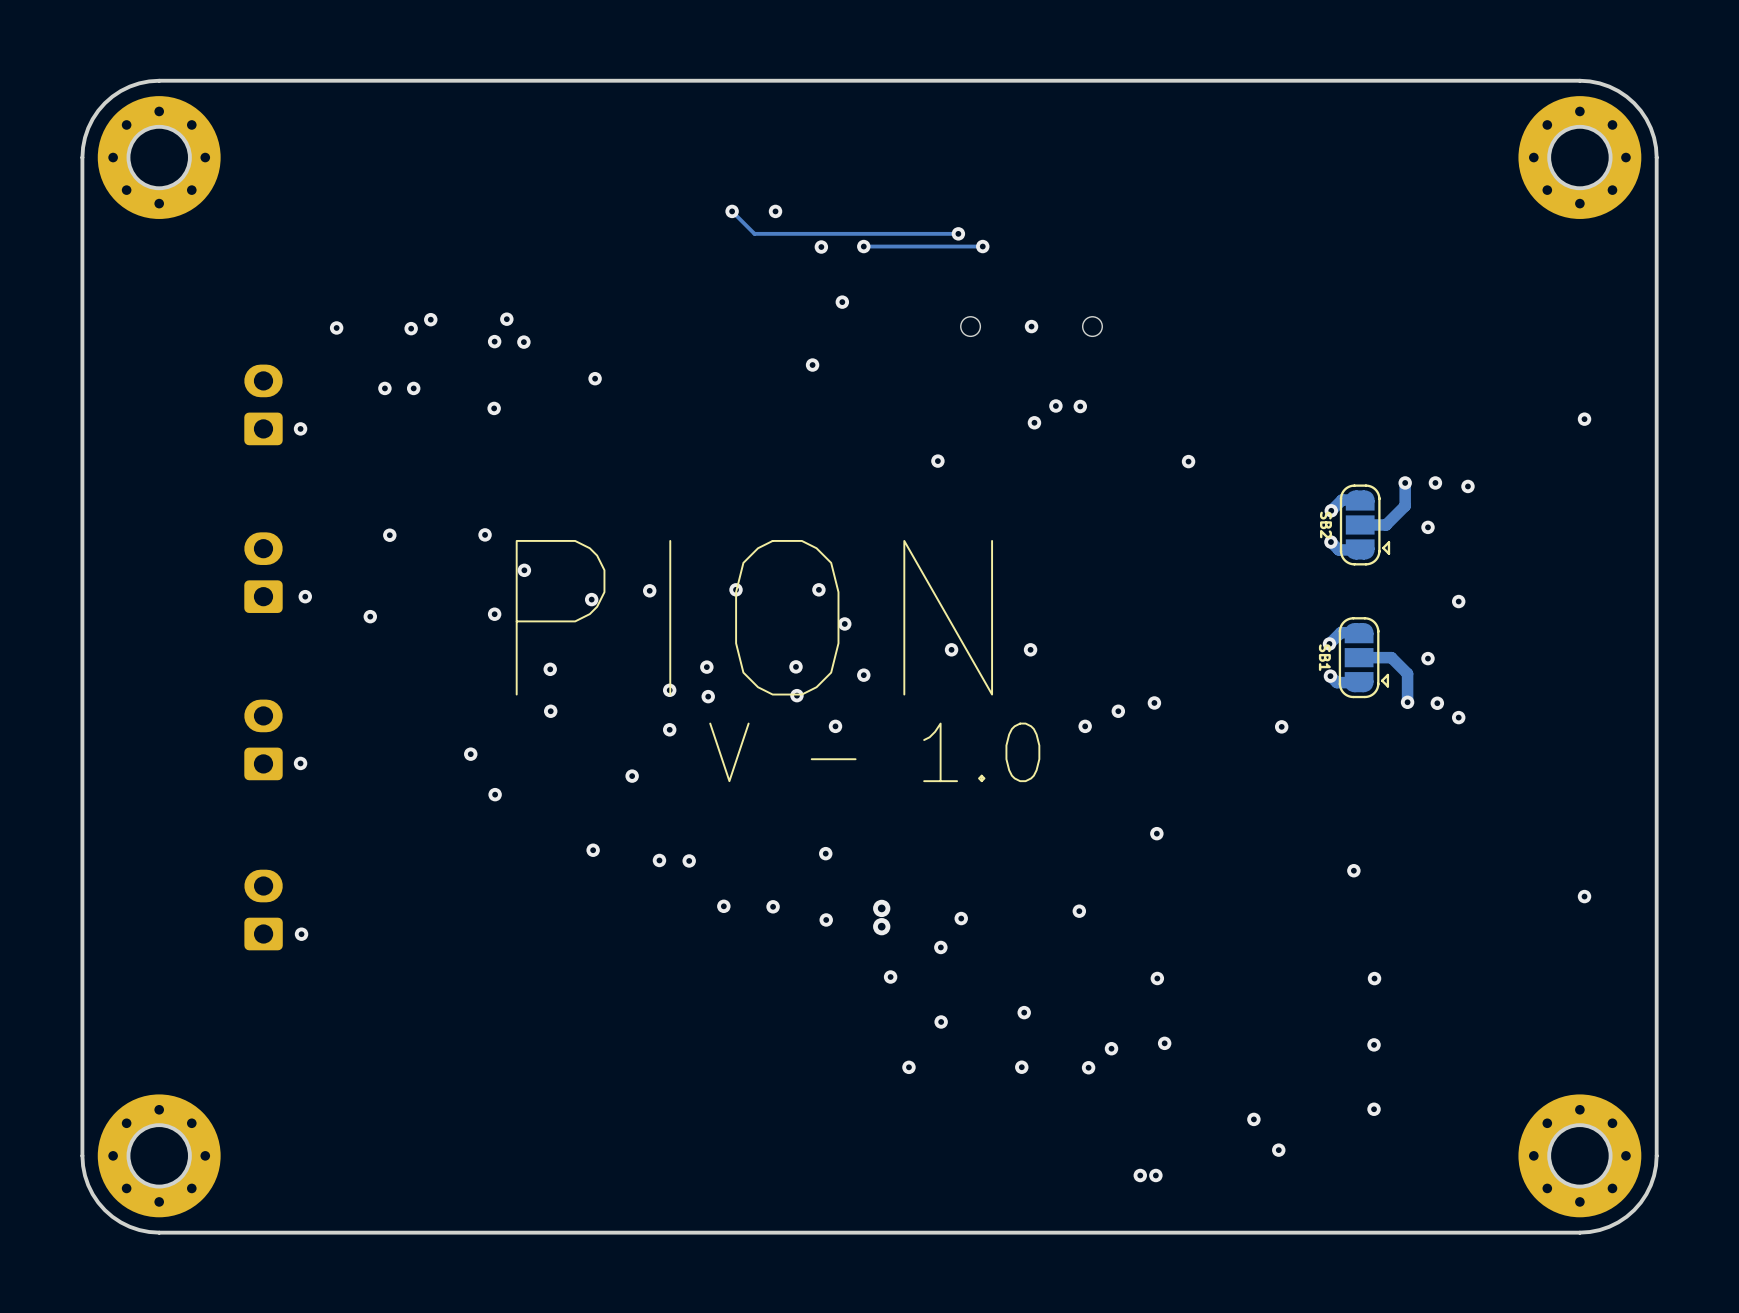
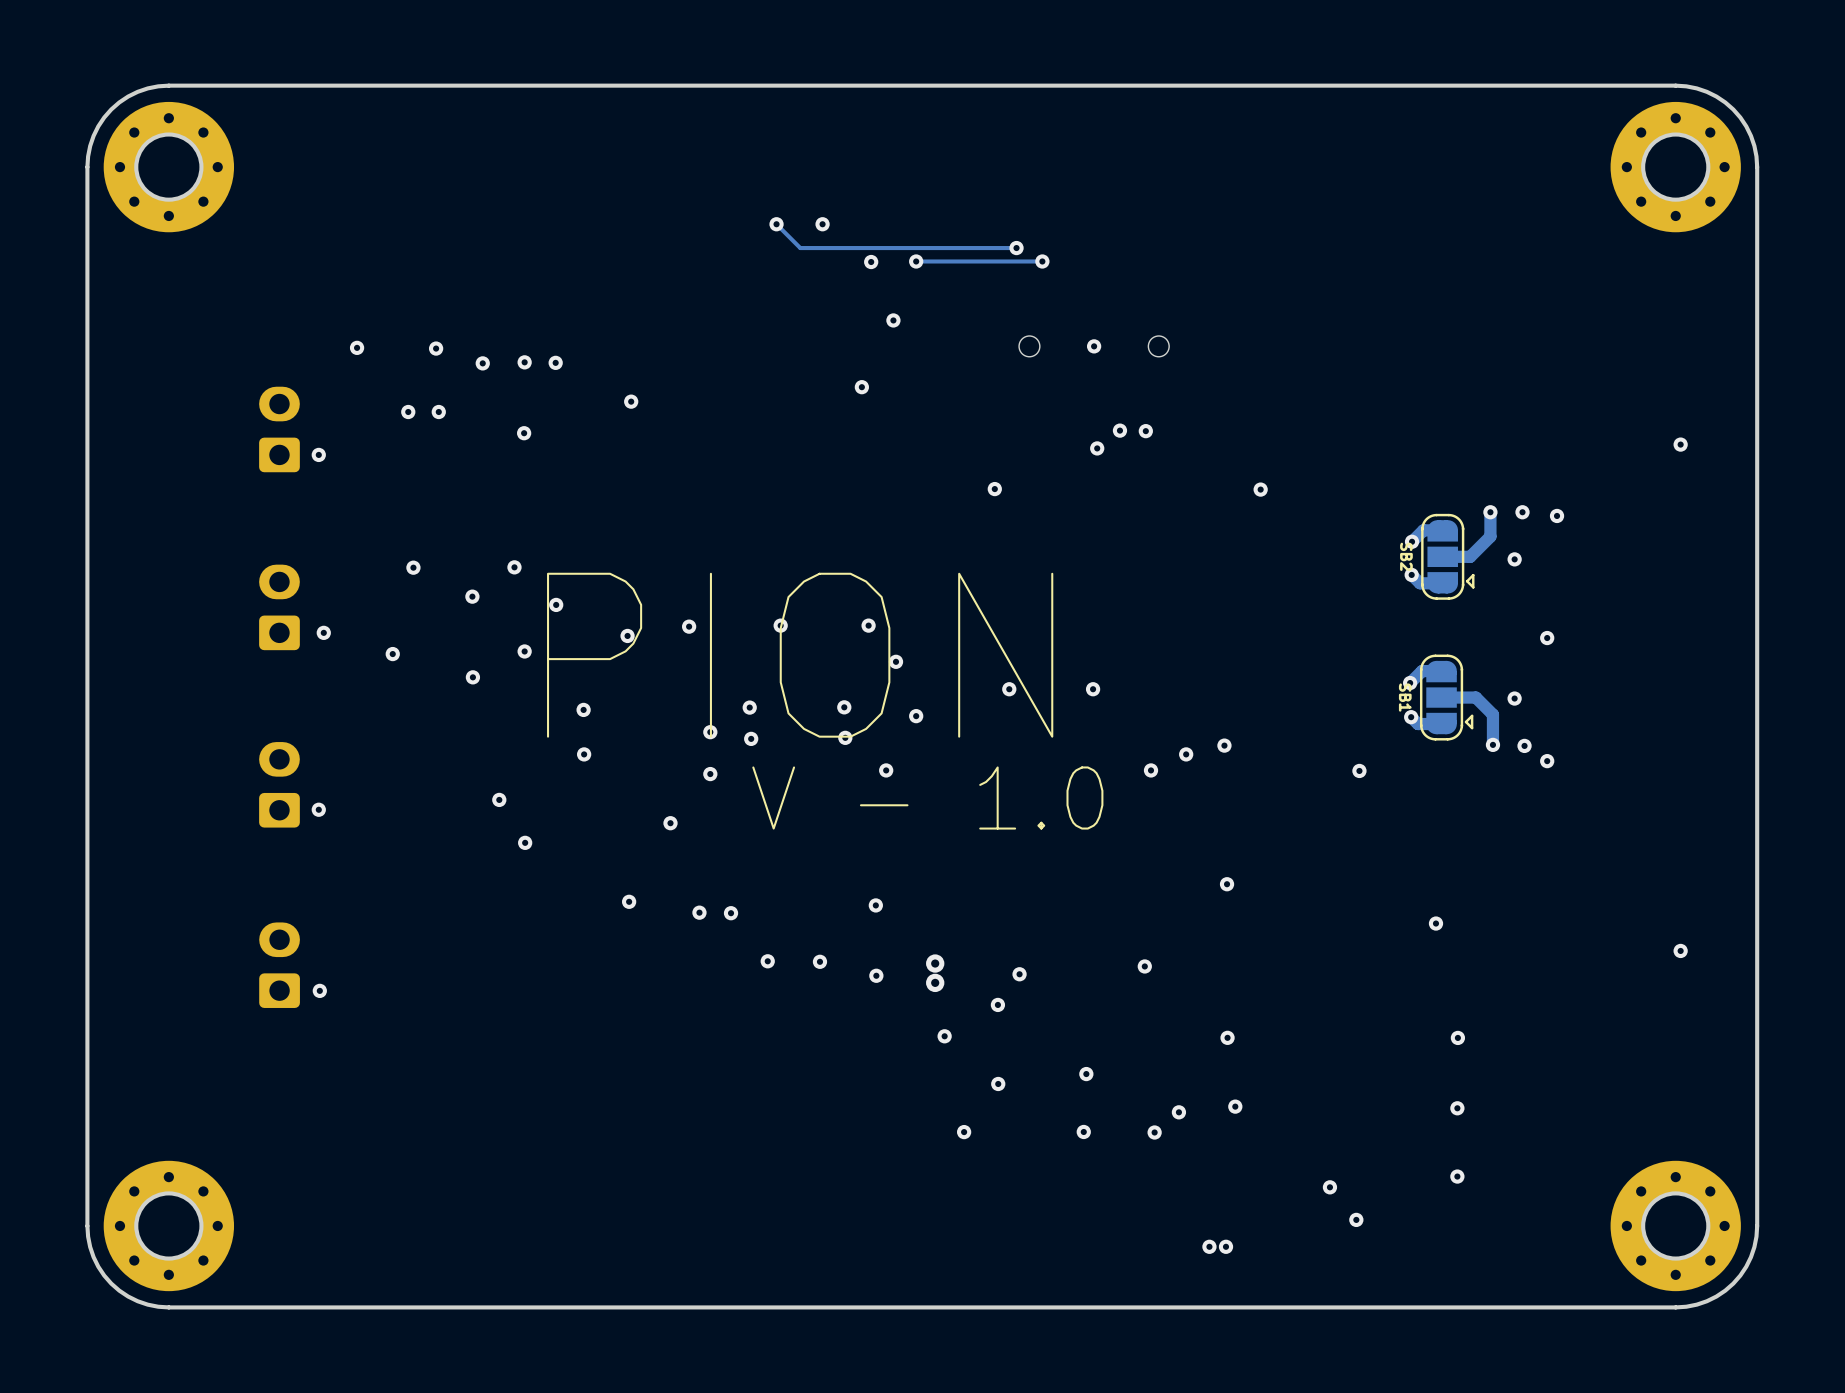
via: (430, 319) -> none
via: (506, 319) -> none
via: none -> (482, 363)
via: none -> (472, 596)
via: none -> (472, 677)

